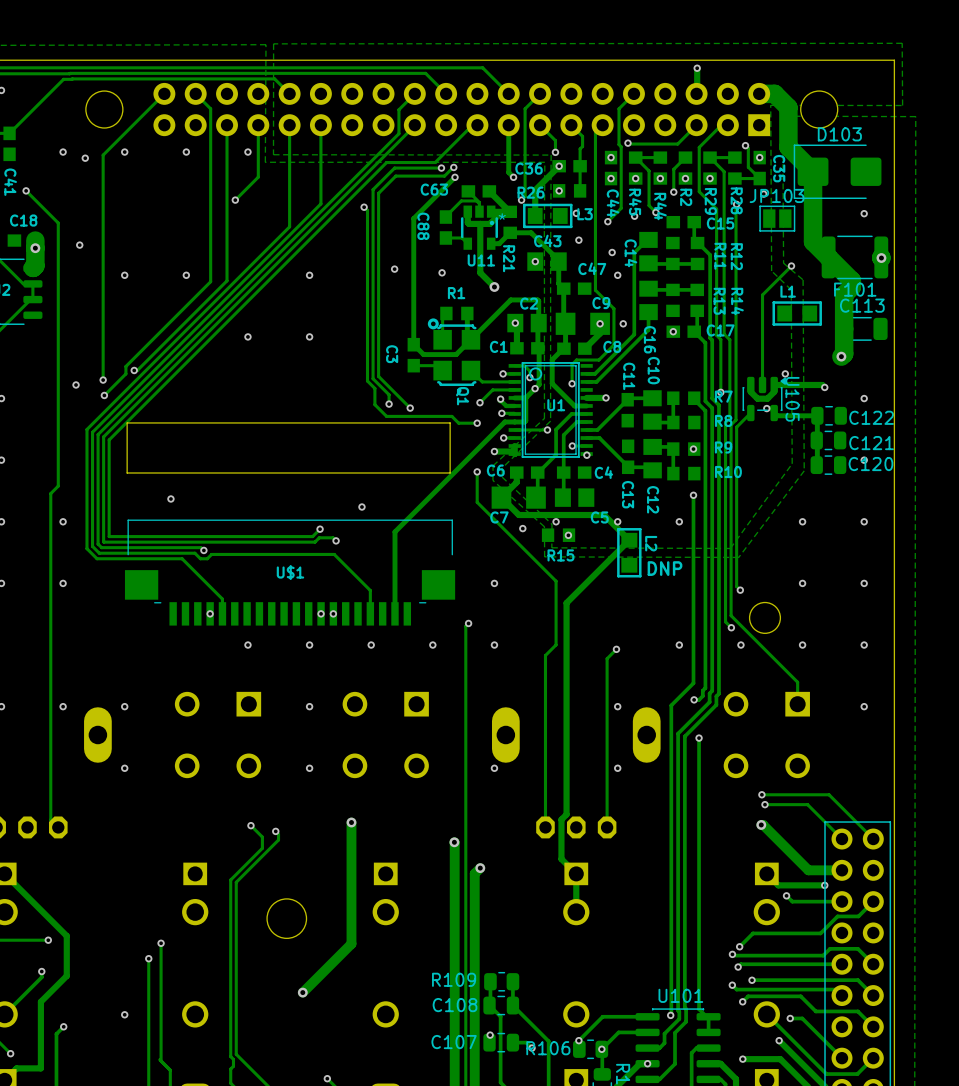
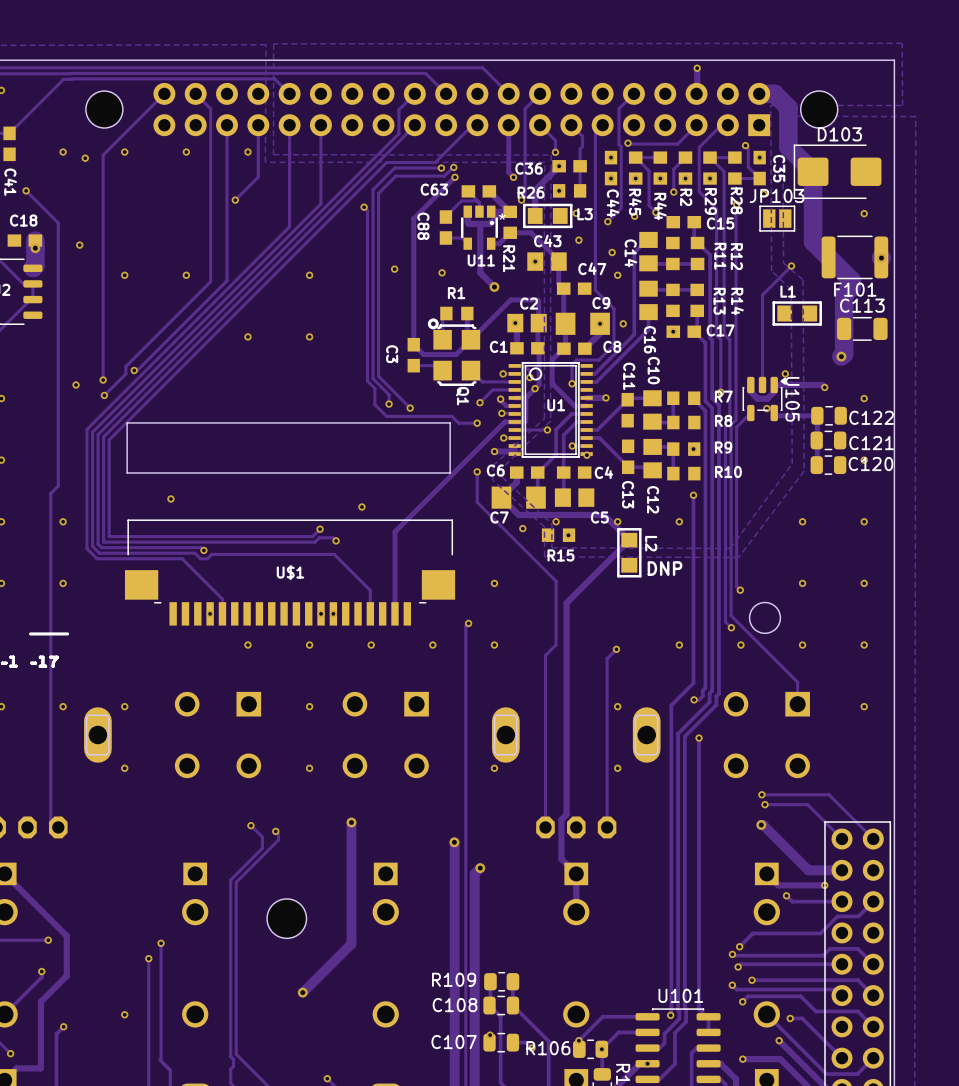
line: none -> (67, 633) (30, 633)
line: none -> (13, 657) (10, 657) (13, 657) (13, 666) (10, 666) (16, 666) (13, 666) (13, 657)
line: none -> (57, 657) (50, 657) (56, 657) (53, 661) (53, 663) (53, 666) (57, 657)
line: none -> (6, 663) (2, 663) (2, 663) (6, 663) (6, 663)
line: none -> (35, 663) (31, 663) (31, 663) (35, 663) (35, 663)
line: none -> (45, 666) (40, 666) (42, 666) (42, 657) (40, 657) (43, 657) (43, 666) (45, 666)

